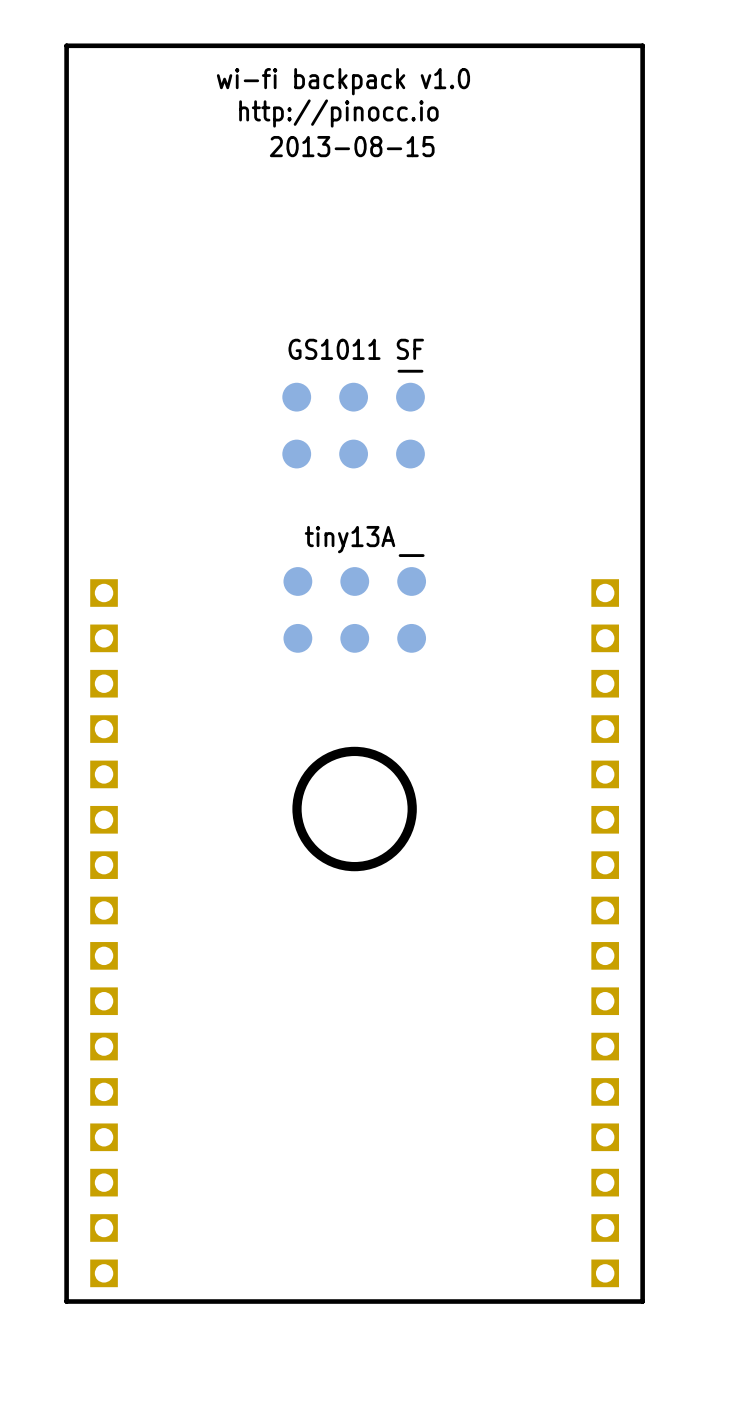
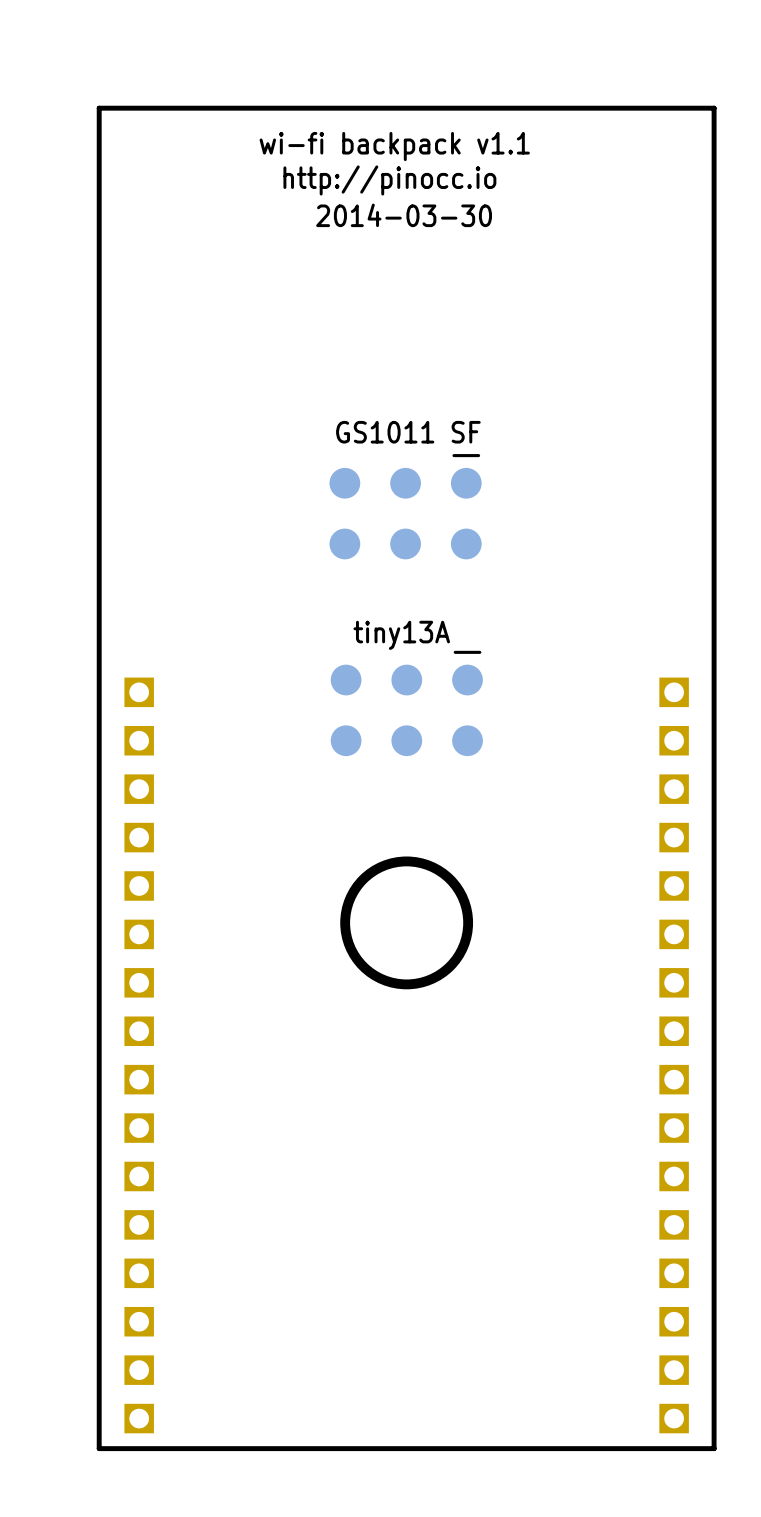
text: wi-fi backpack v1.0 (343, 81) -> wi-fi backpack v1.1 (394, 146)
text: 2013-08-15 (352, 146) -> 2014-03-30 (404, 215)

